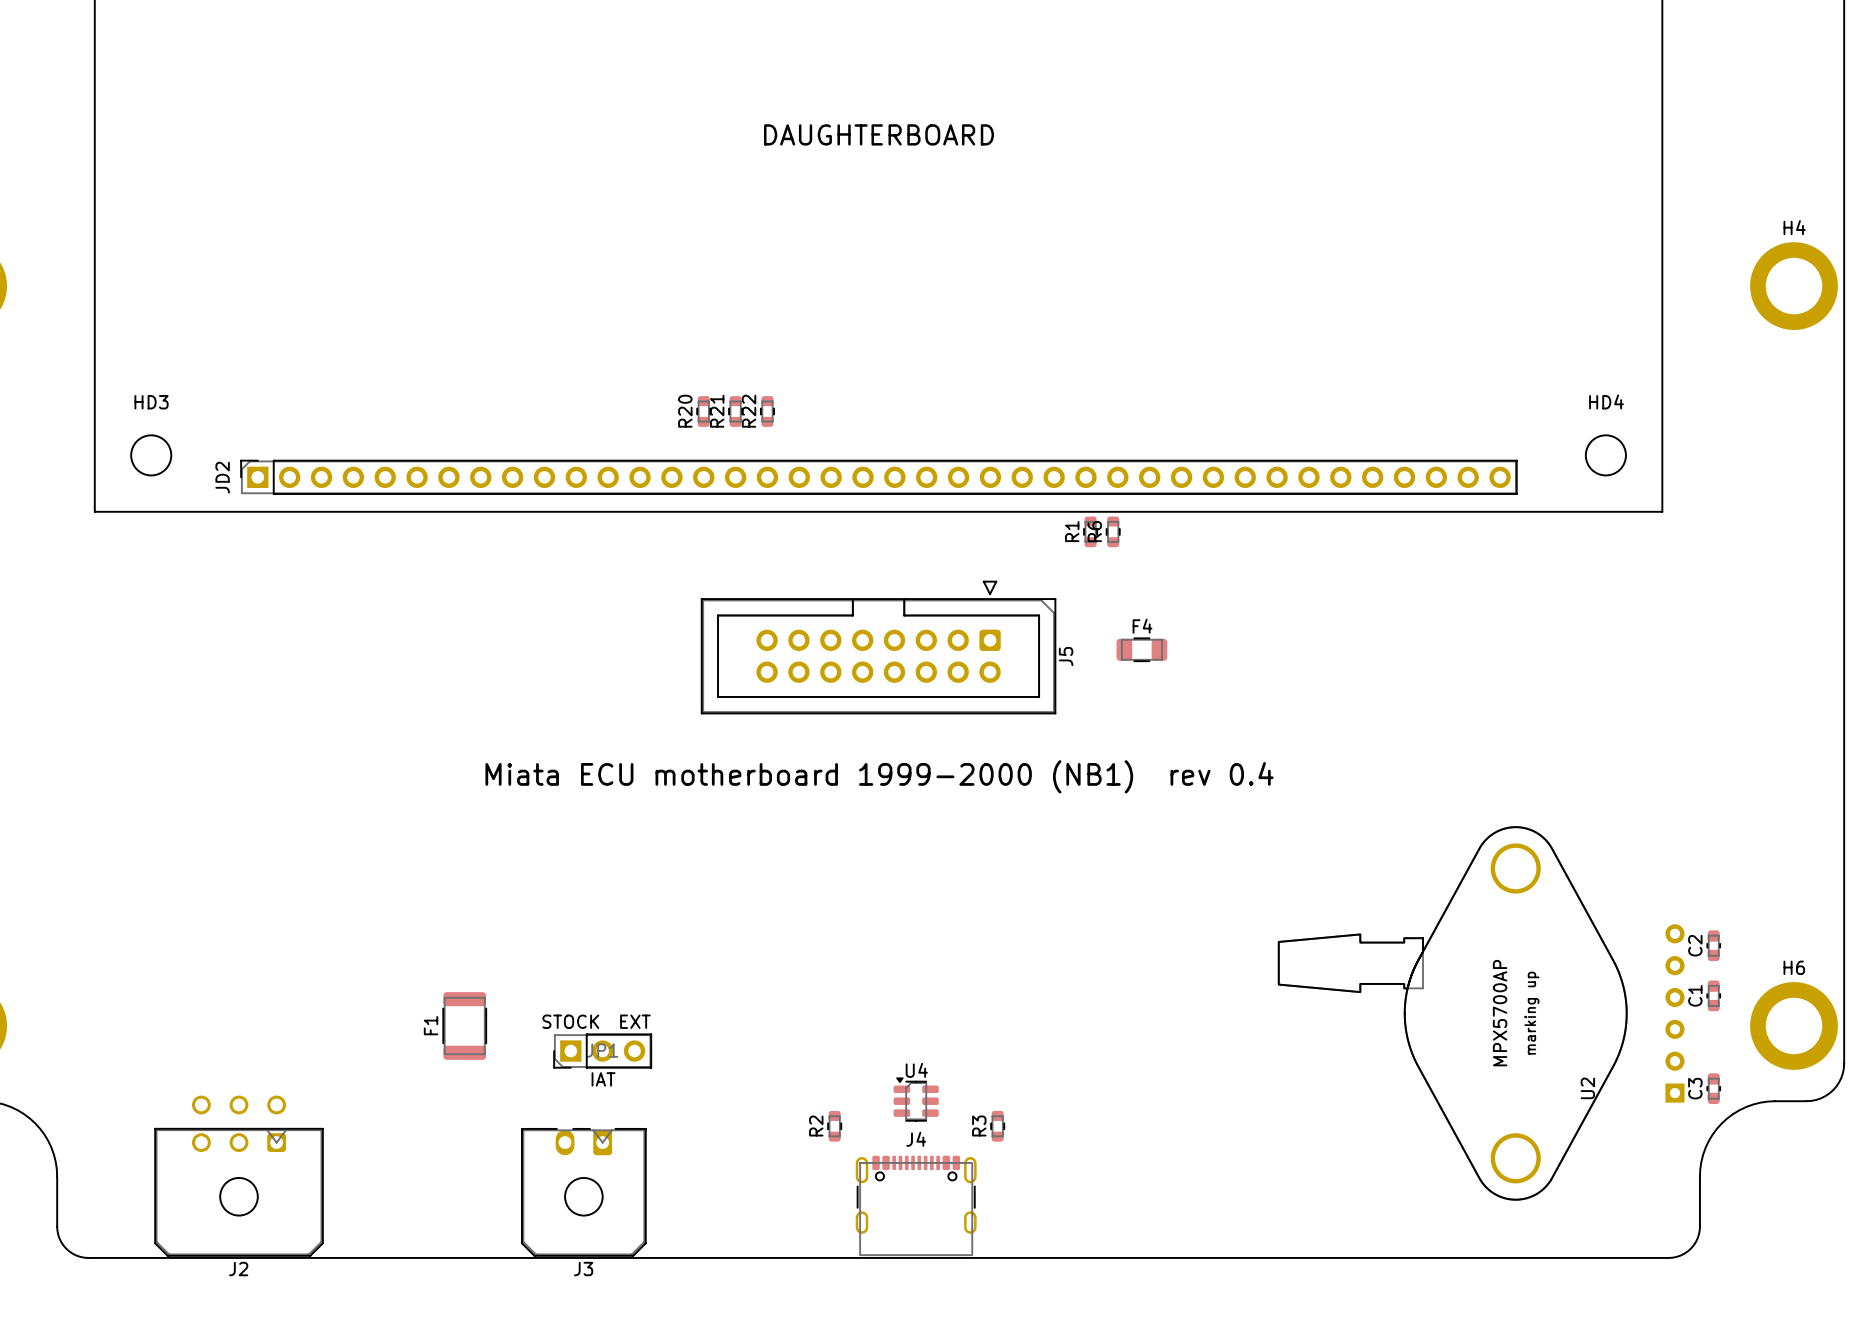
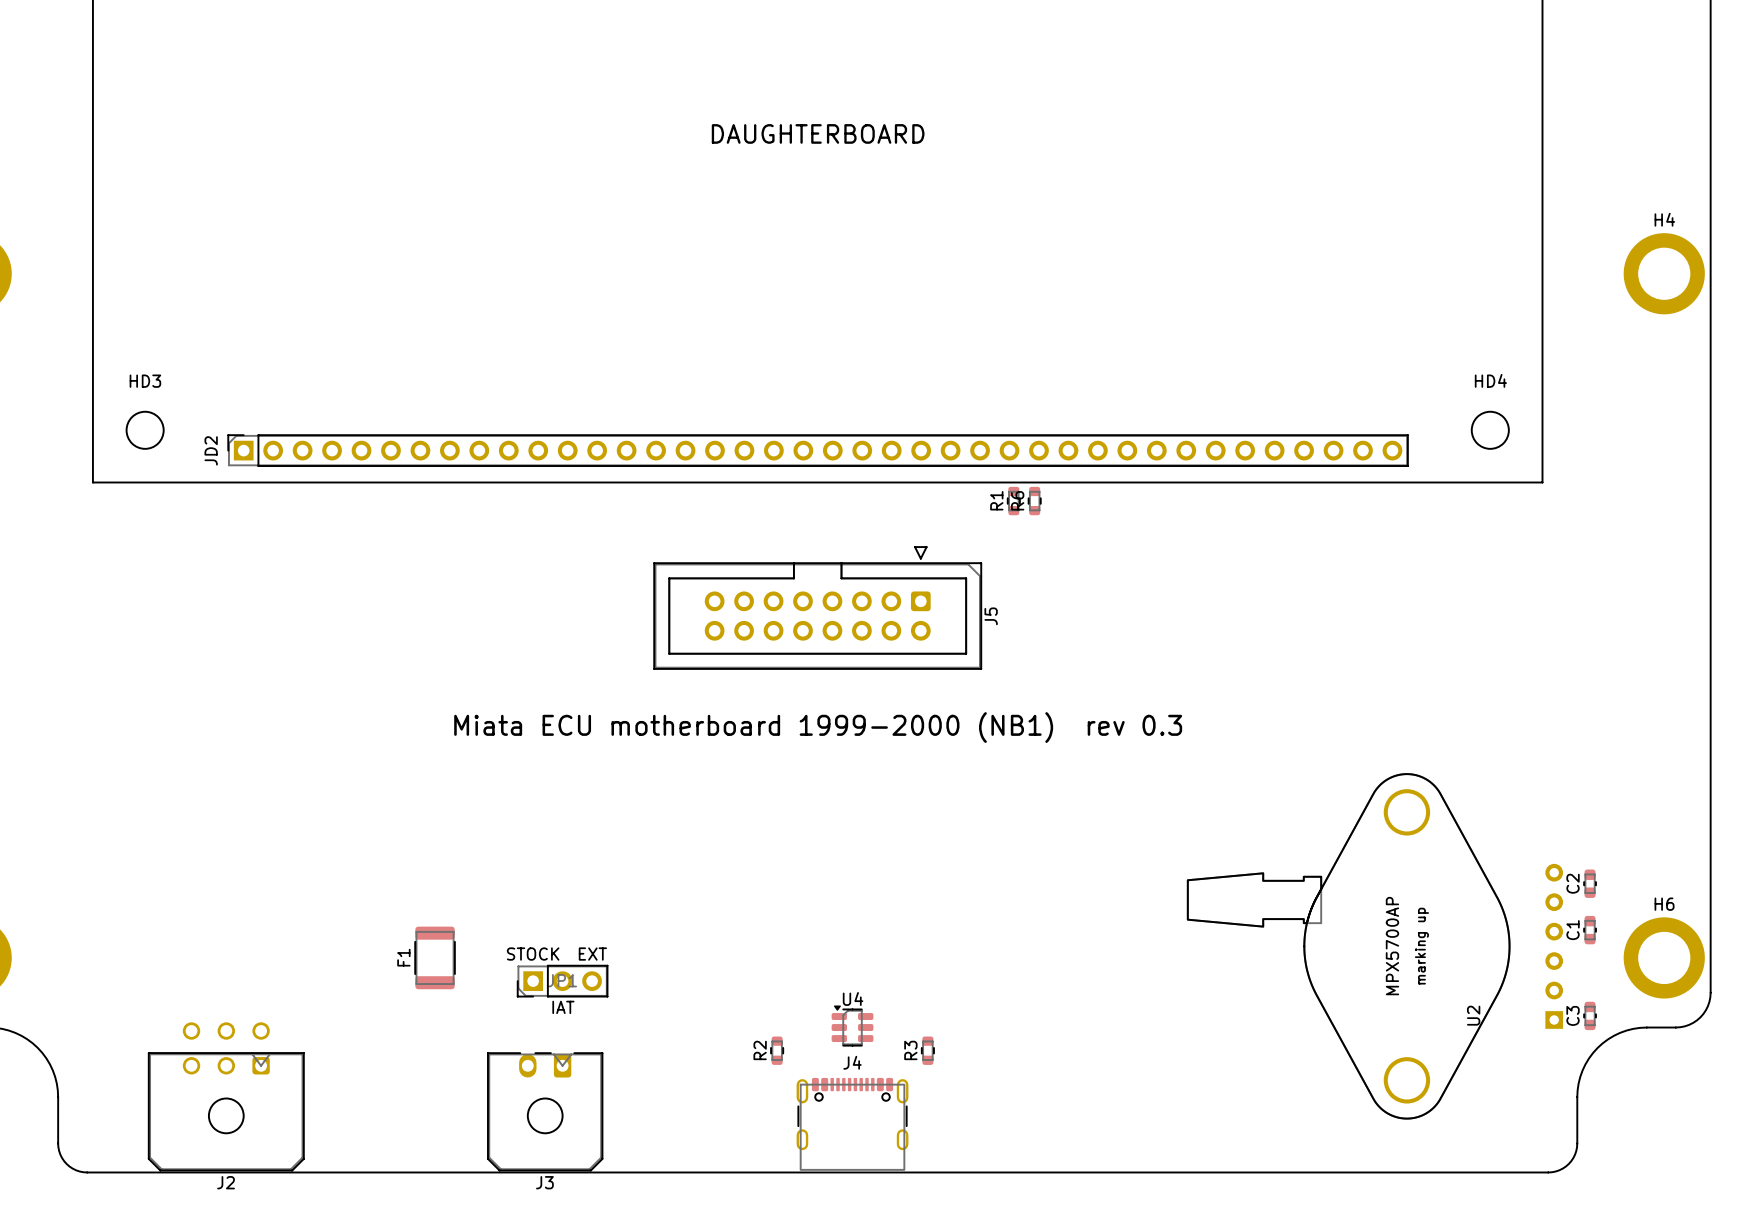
R20: (703, 411) -> none
R21: (735, 411) -> none
R22: (767, 411) -> none
F4: (1141, 649) -> none
text: Miata ECU motherboard 1999-2000 (NB1) rev 0.4 (879, 776) -> Miata ECU motherboard 1999-2000 (NB1) rev 0.3 (818, 727)

